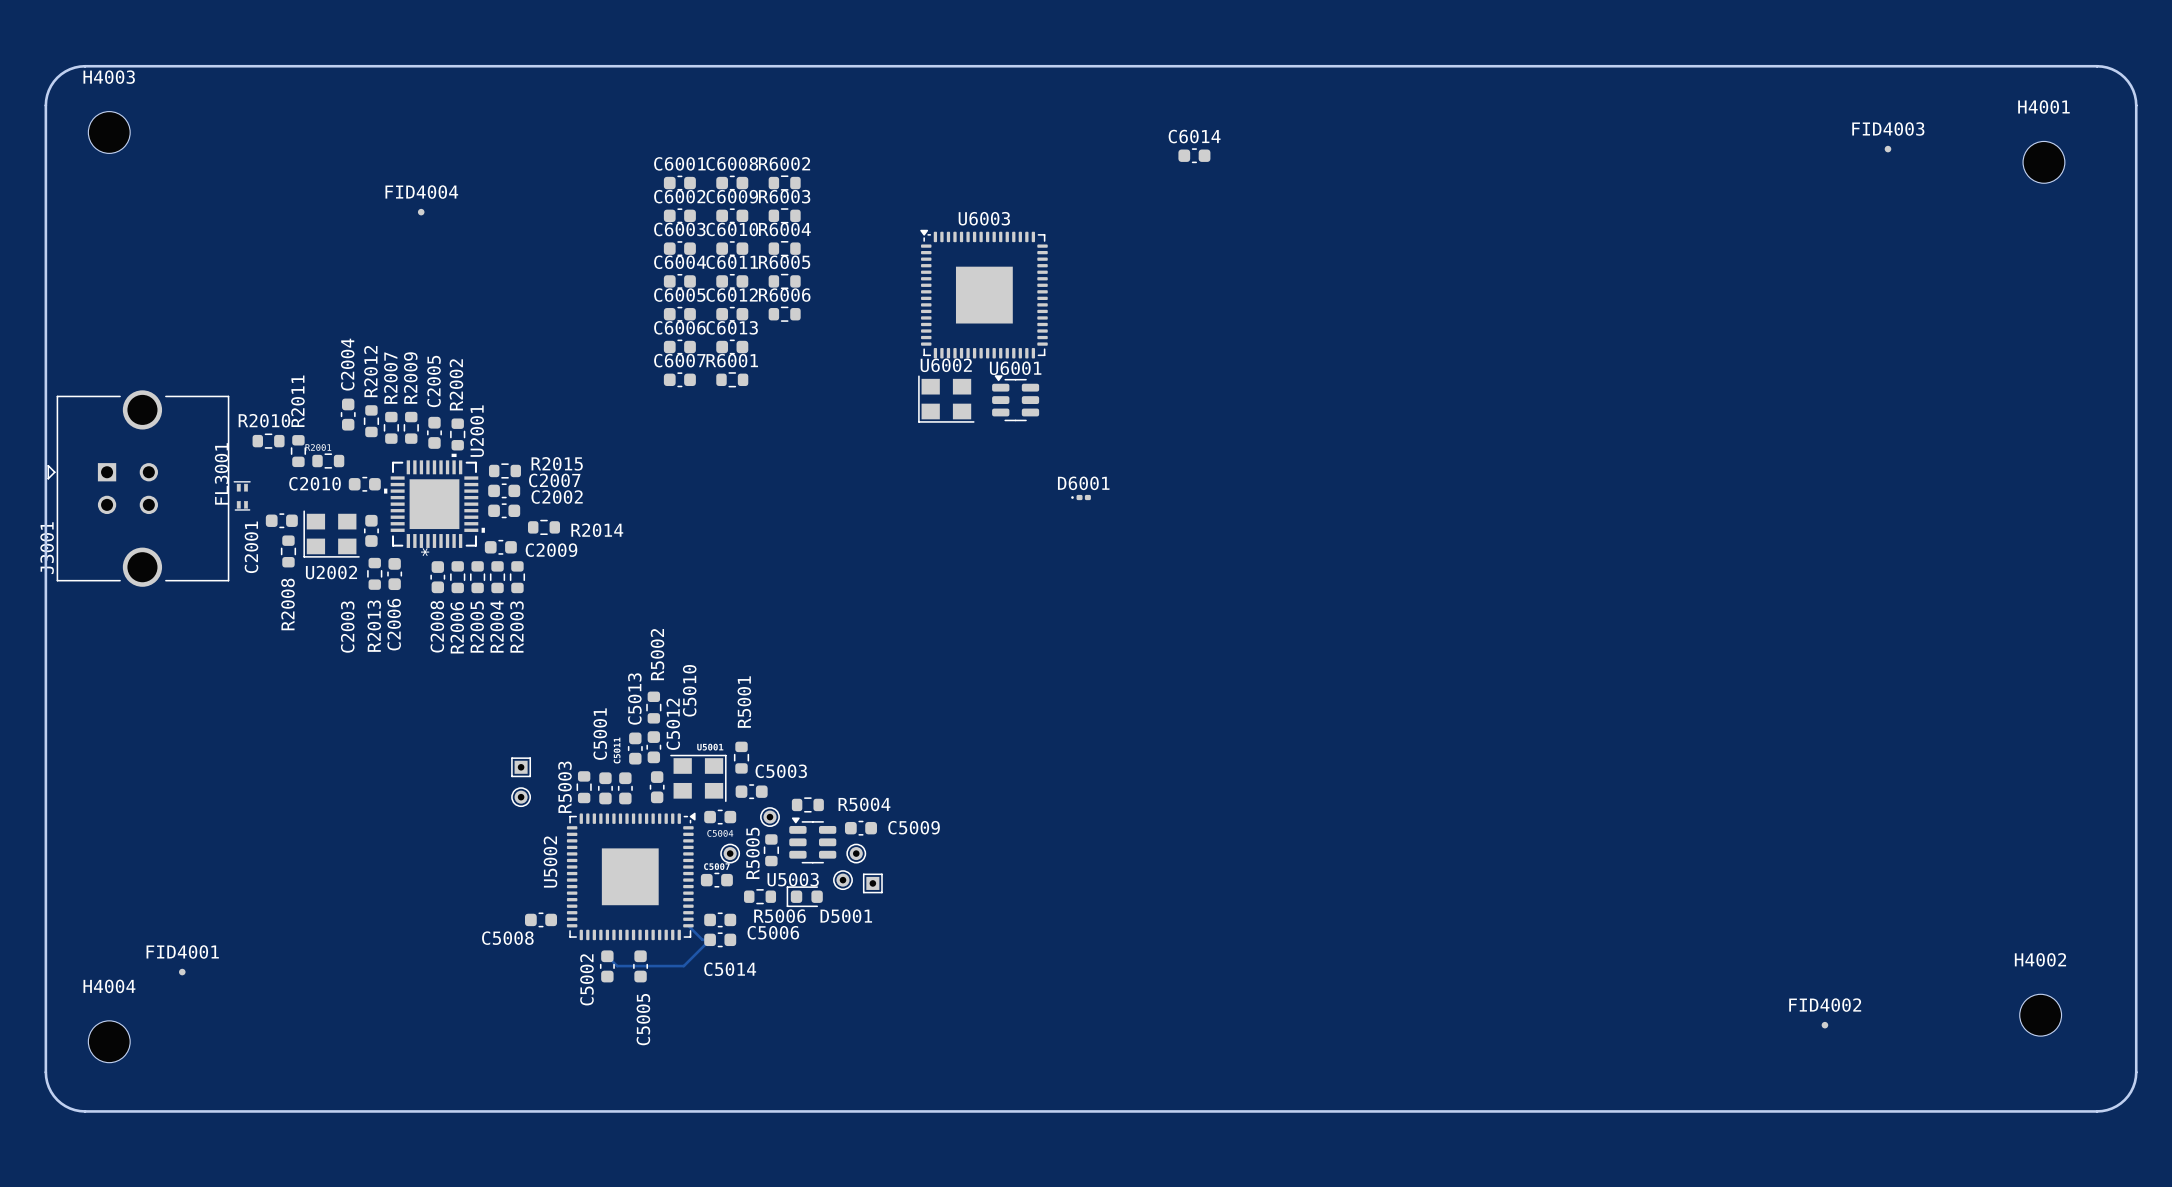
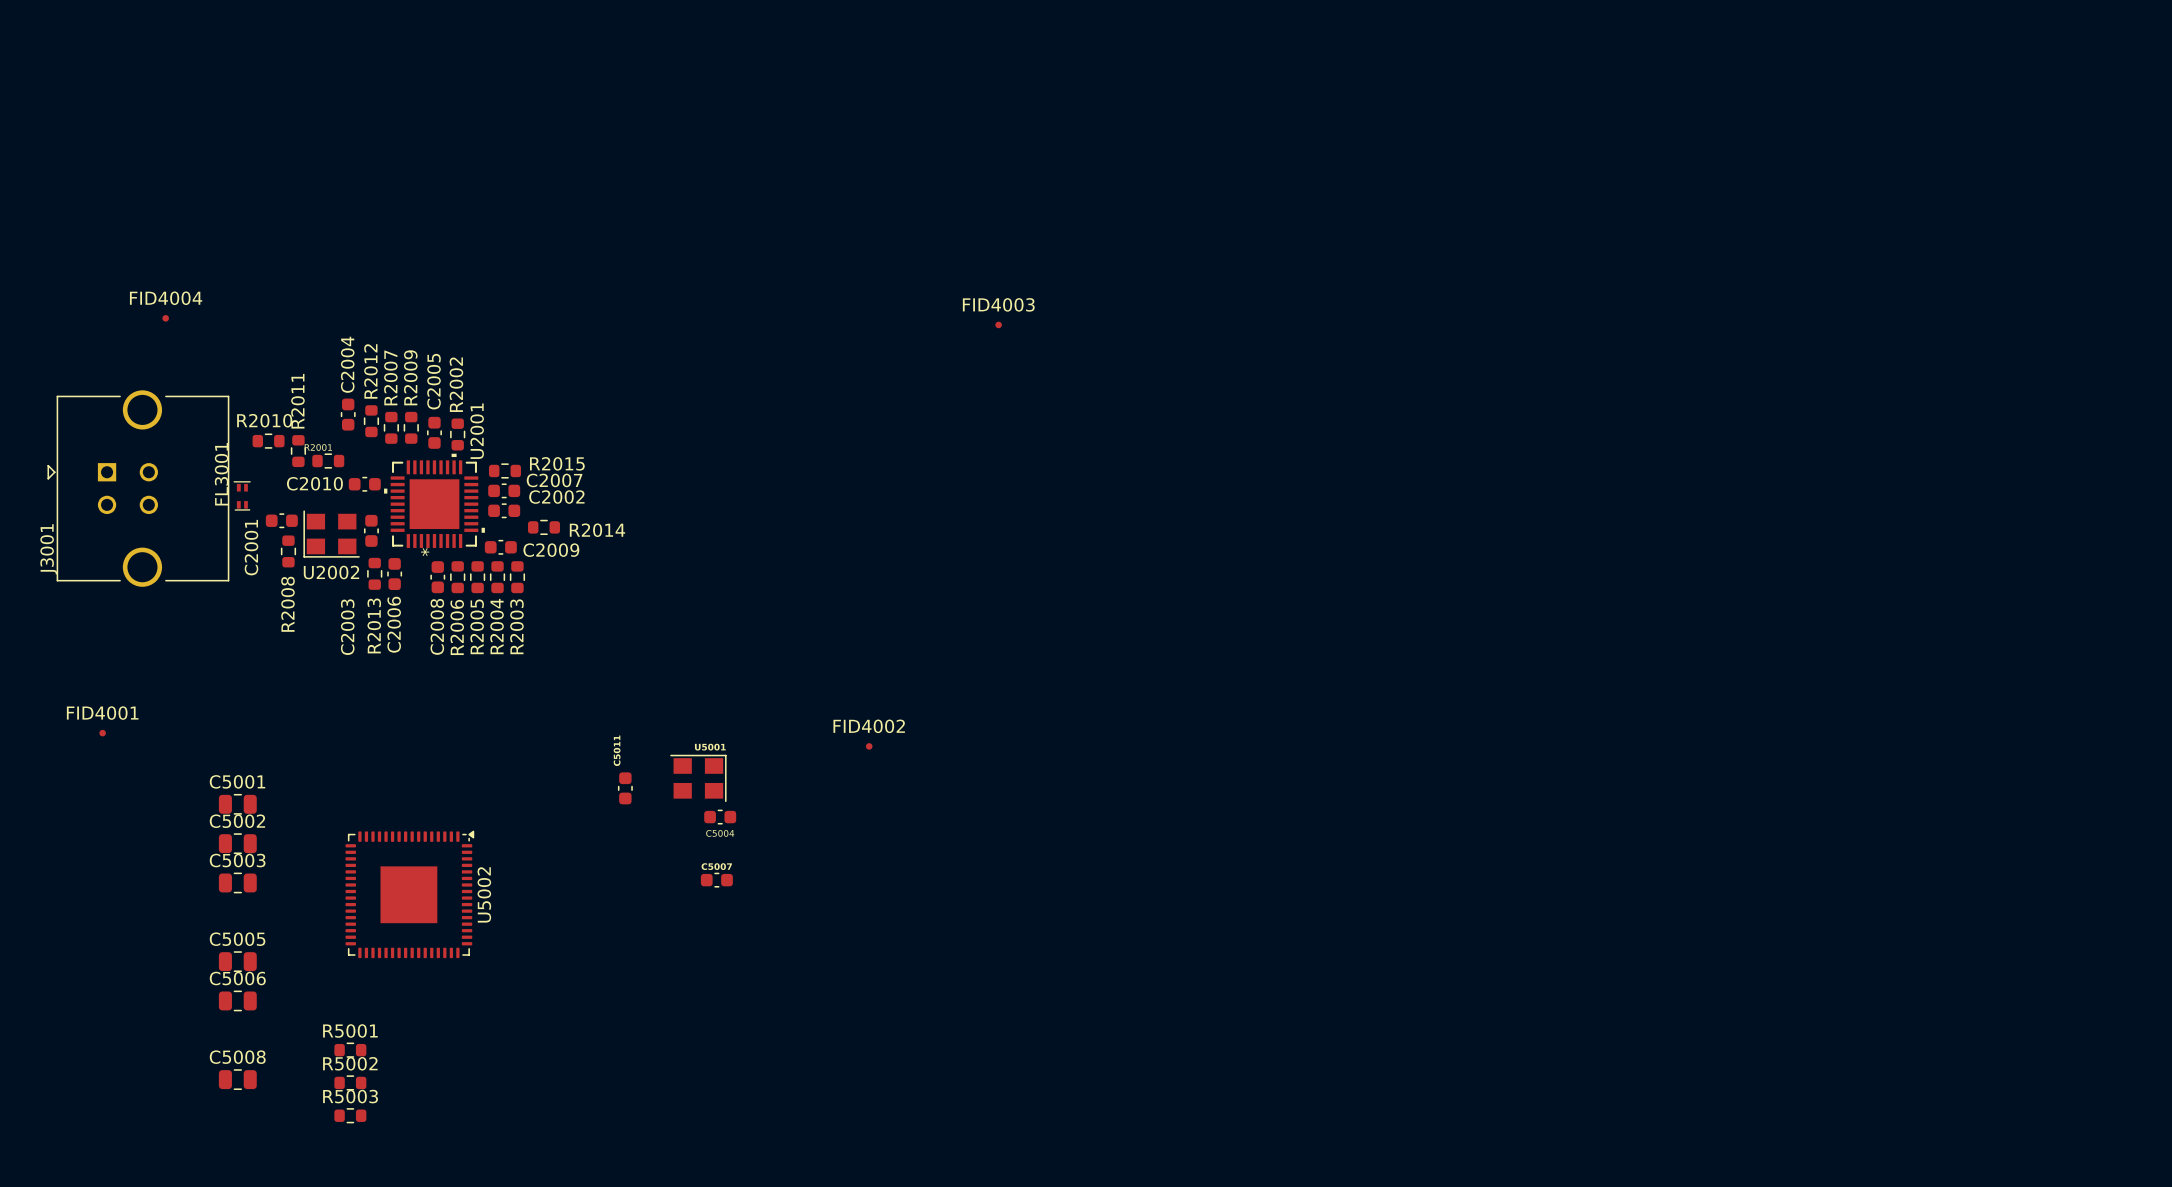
board edge: (85, 66) (2097, 66) (2116, 71) (2131, 85) (2136, 105) (2136, 1072) (2131, 1091) (2116, 1106) (2097, 1111) (85, 1111) (65, 1106) (51, 1091) (45, 1072) (45, 105) (48, 90) (57, 77) (70, 69) (85, 66) -> none
H4003: (109, 132) -> none
FID4003 position: (1887, 149) -> (998, 324)
C6014: (1194, 155) -> none
H4001: (2043, 162) -> none
C6001: (679, 183) -> none
C6008: (732, 183) -> none
R6002: (784, 183) -> none
FID4004 position: (421, 212) -> (165, 318)
C6002: (679, 215) -> none
C6009: (732, 215) -> none
R6003: (784, 215) -> none
C6003: (679, 248) -> none
C6010: (732, 248) -> none
R6004: (784, 248) -> none
C6004: (679, 281) -> none
C6011: (732, 281) -> none
R6005: (784, 281) -> none
U6003: (983, 294) -> none
C6005: (679, 314) -> none
C6012: (732, 314) -> none
R6006: (784, 314) -> none
C6006: (679, 347) -> none
C6013: (732, 347) -> none
C6007: (679, 379) -> none
R6001: (732, 379) -> none
U6001: (1015, 398) -> none
U6002: (946, 399) -> none
D6001: (1081, 497) -> none
R5002 name position: R5002 (657, 654) -> R5002 (350, 1063)
R5001 name position: R5001 (744, 702) -> R5001 (350, 1030)
R5002 rotation: 0° (653, 707) -> 90° clockwise (350, 1082)
R5002 position: (653, 707) -> (350, 1082)
C5001 name position: C5001 (600, 734) -> C5001 (237, 781)
C5010: (653, 747) -> none
C5013: (635, 748) -> none
R5001 rotation: 0° (741, 757) -> 90° clockwise (350, 1050)
R5001 position: (741, 757) -> (350, 1050)
part: (521, 767) -> none
C5003 name position: C5003 (781, 771) -> C5003 (237, 860)
C5001 footprint: [598, 772, 613, 805] -> [218, 793, 257, 815]
C5003 footprint: [735, 784, 768, 800] -> [218, 872, 257, 894]
R5003 rotation: 0° (584, 787) -> 90° clockwise (350, 1115)
R5003 position: (584, 787) -> (350, 1115)
C5012: (657, 787) -> none
part: (521, 797) -> none
R5004: (807, 804) -> none
part: (769, 817) -> none
C5009: (860, 828) -> none
U5003: (812, 840) -> none
R5005: (771, 850) -> none
part: (730, 853) -> none
part: (856, 853) -> none
U5002 name position: U5002 (550, 862) -> U5002 (484, 894)
U5002 position: (631, 876) -> (409, 894)
part: (842, 880) -> none
part: (872, 883) -> none
R5006: (760, 896) -> none
D5001: (804, 896) -> none
C5008 footprint: [525, 912, 558, 928] -> [218, 1069, 257, 1090]
C5006 footprint: [704, 912, 737, 928] -> [218, 990, 257, 1012]
track: (688, 925) (702, 939) (710, 939) (683, 966) (617, 966) (607, 956) -> none
C5006 name position: C5006 (773, 932) -> C5006 (237, 978)
C5008 name position: C5008 (507, 938) -> C5008 (237, 1057)
C5014: (720, 939) -> none
C5002 footprint: [599, 950, 615, 983] -> [218, 833, 257, 855]
C5005 footprint: [633, 950, 649, 983] -> [218, 951, 257, 973]
FID4001 position: (182, 972) -> (102, 733)
C5002 name position: C5002 (586, 979) -> C5002 (237, 821)
H4002: (2040, 1015) -> none
C5005 name position: C5005 (643, 1019) -> C5005 (237, 939)
FID4002 position: (1824, 1025) -> (869, 746)
H4004: (109, 1041) -> none

